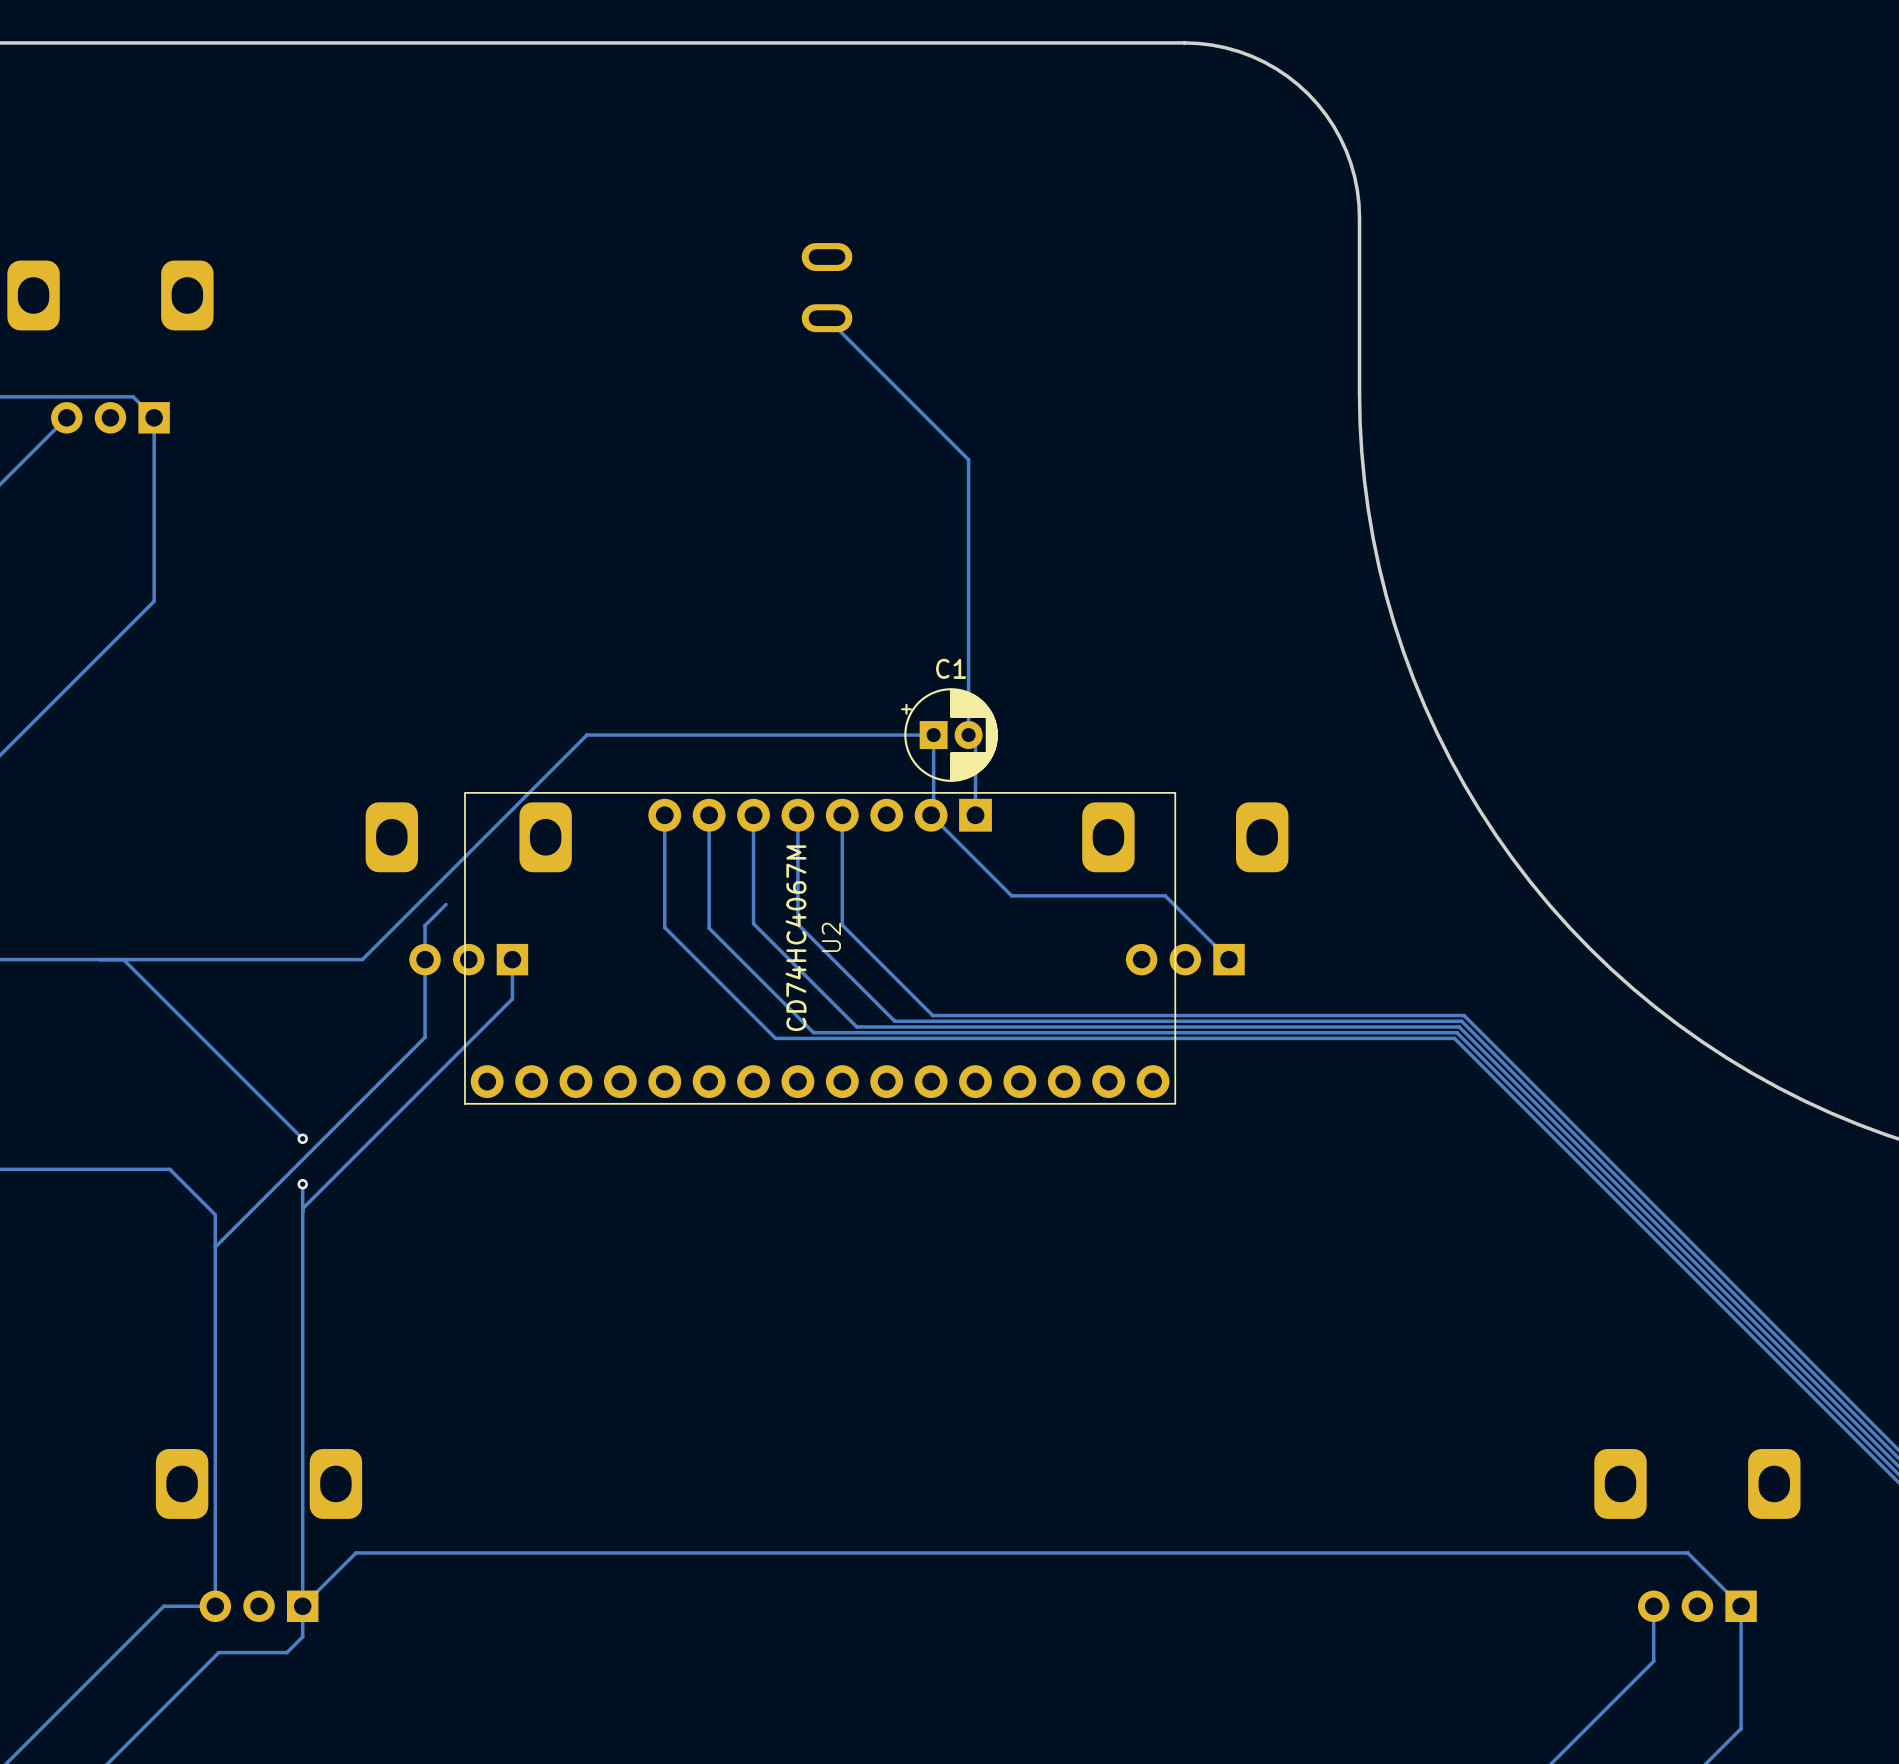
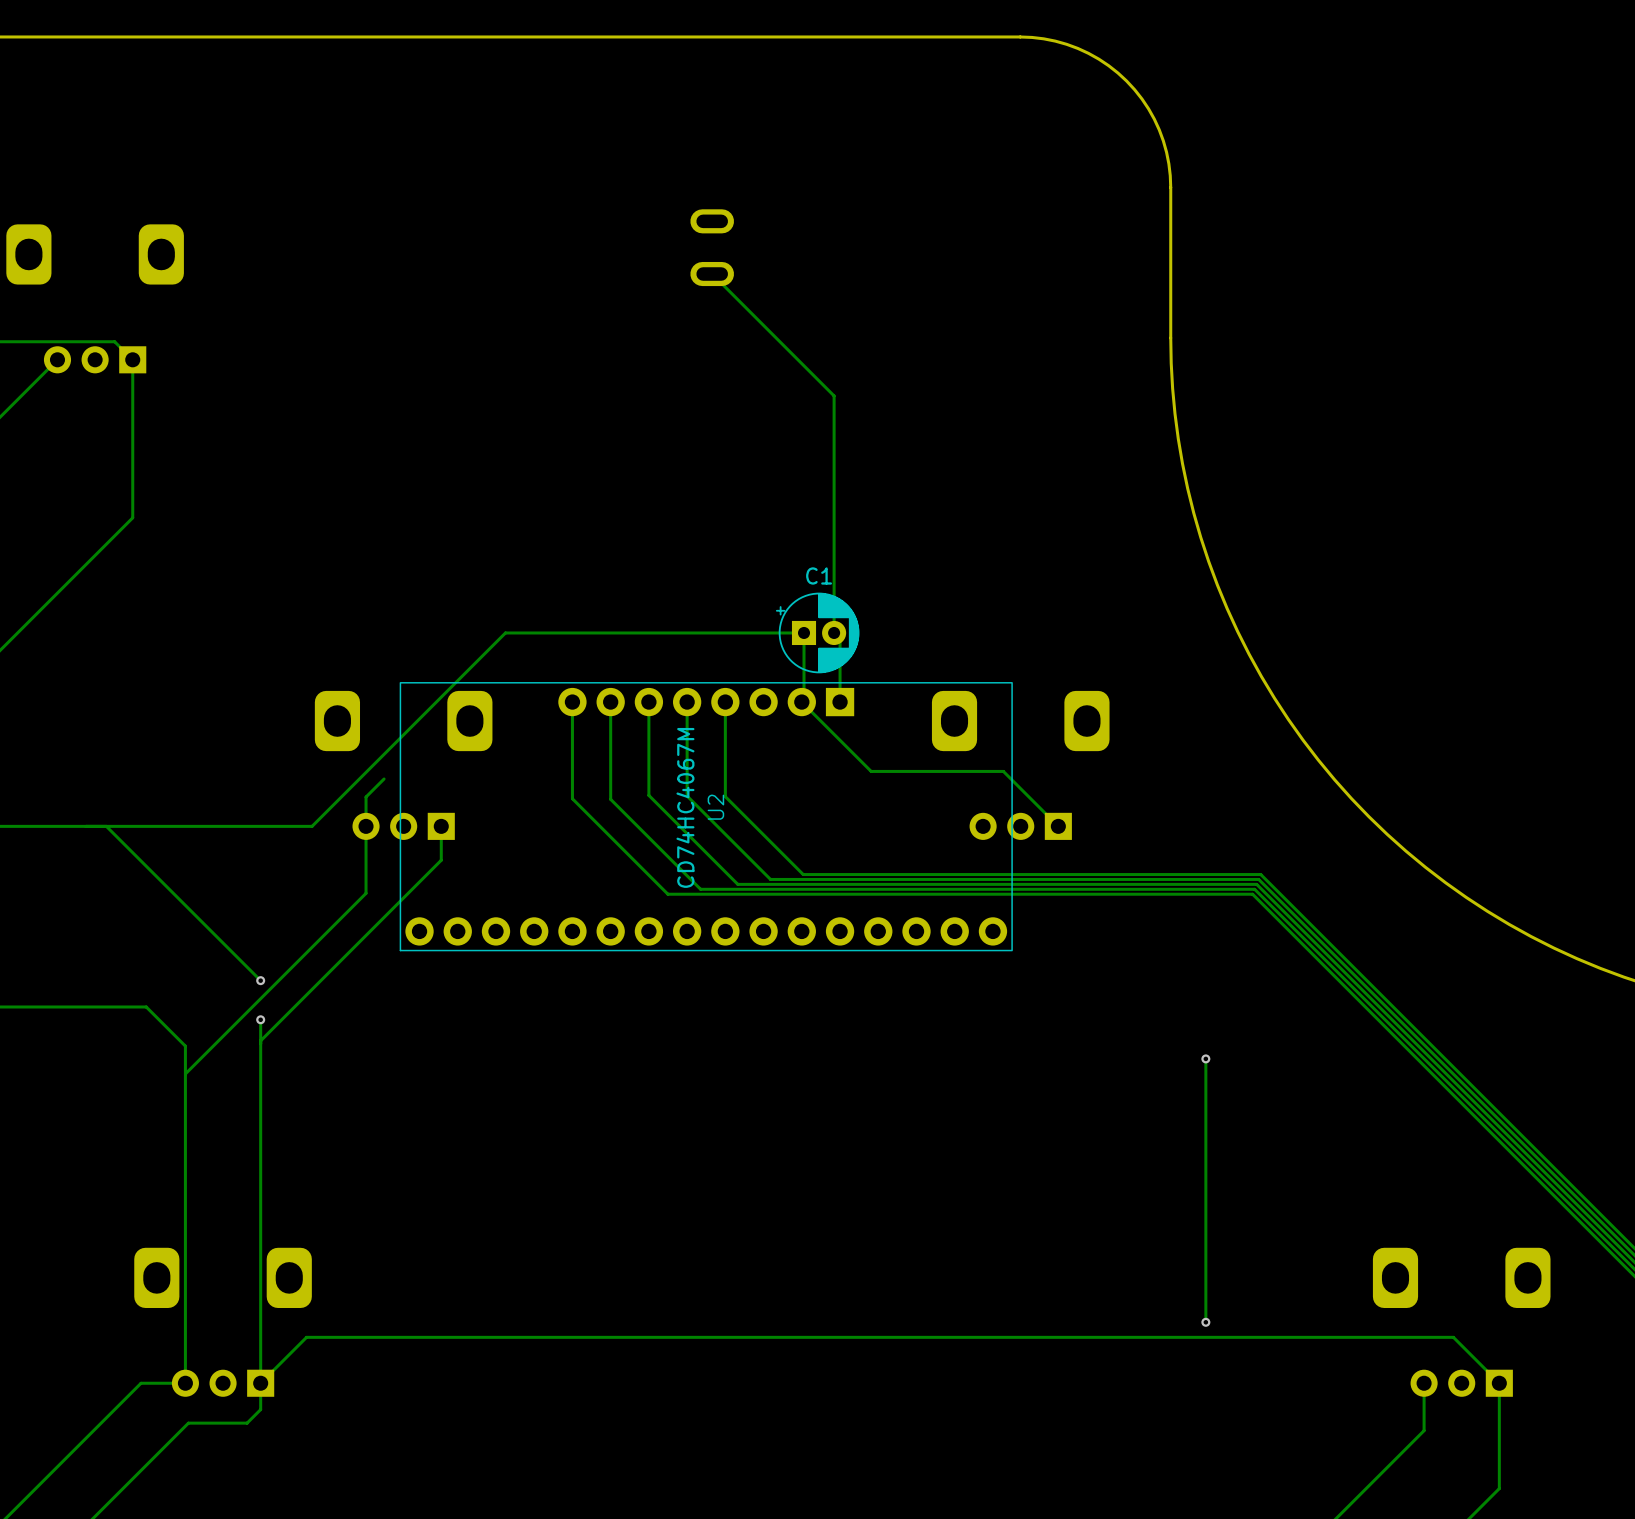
track: none -> (1205, 1058) (1205, 1322)
via: none -> (1205, 1058)
via: none -> (1205, 1322)

